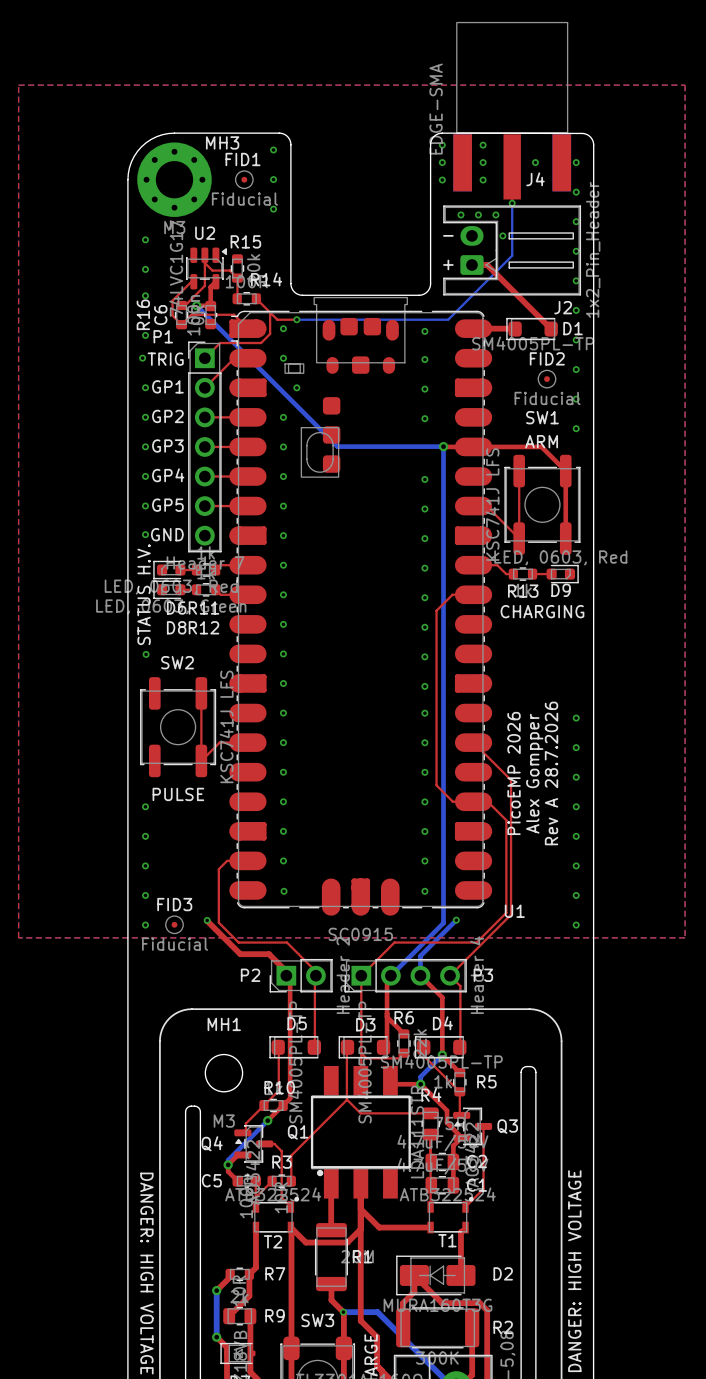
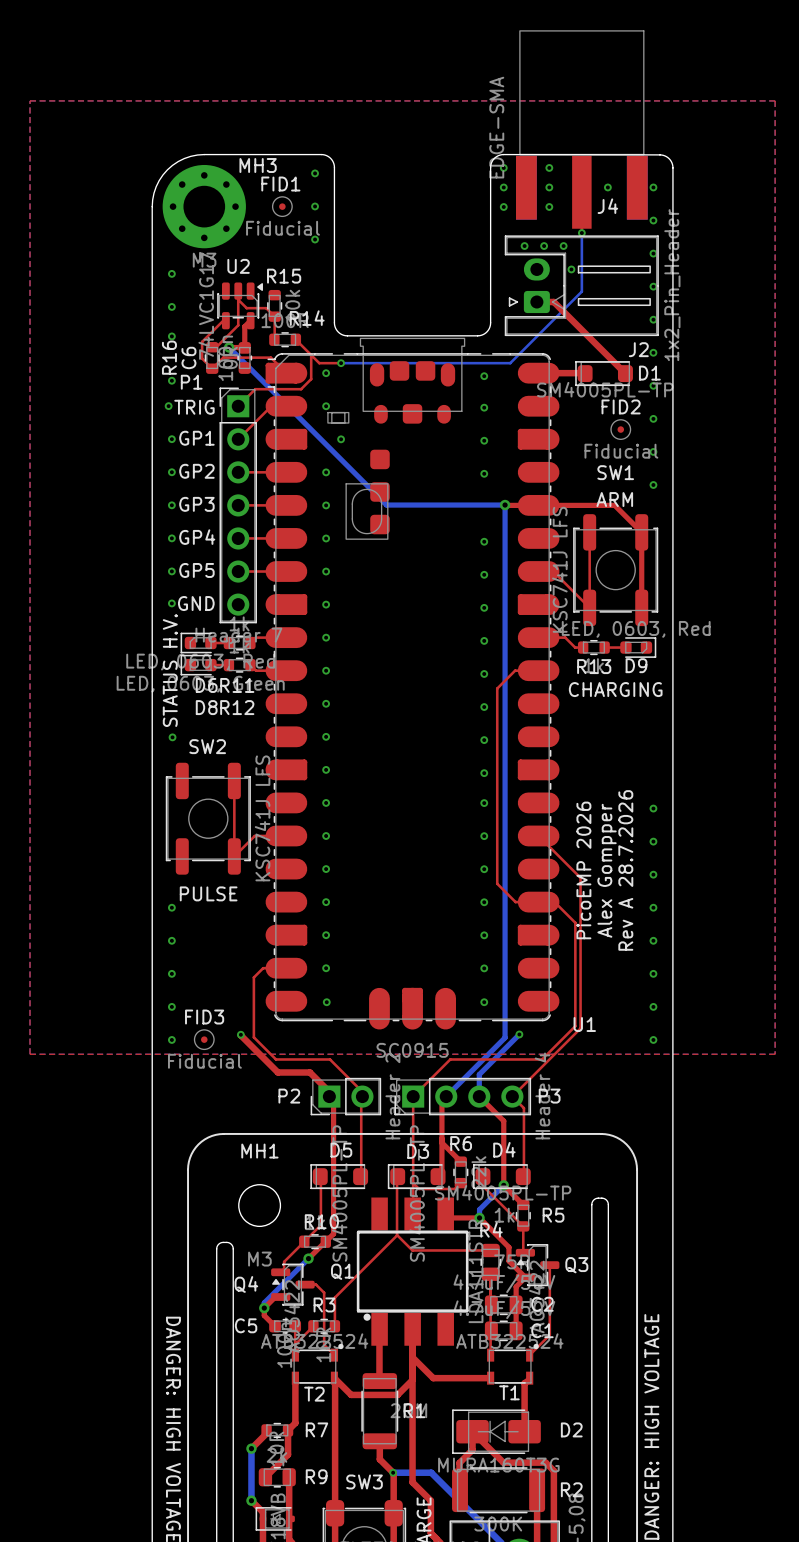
J2 footprint: [443, 205, 582, 296] -> [504, 235, 659, 337]
text: - (448, 235) -> none
text: + (448, 264) -> none

